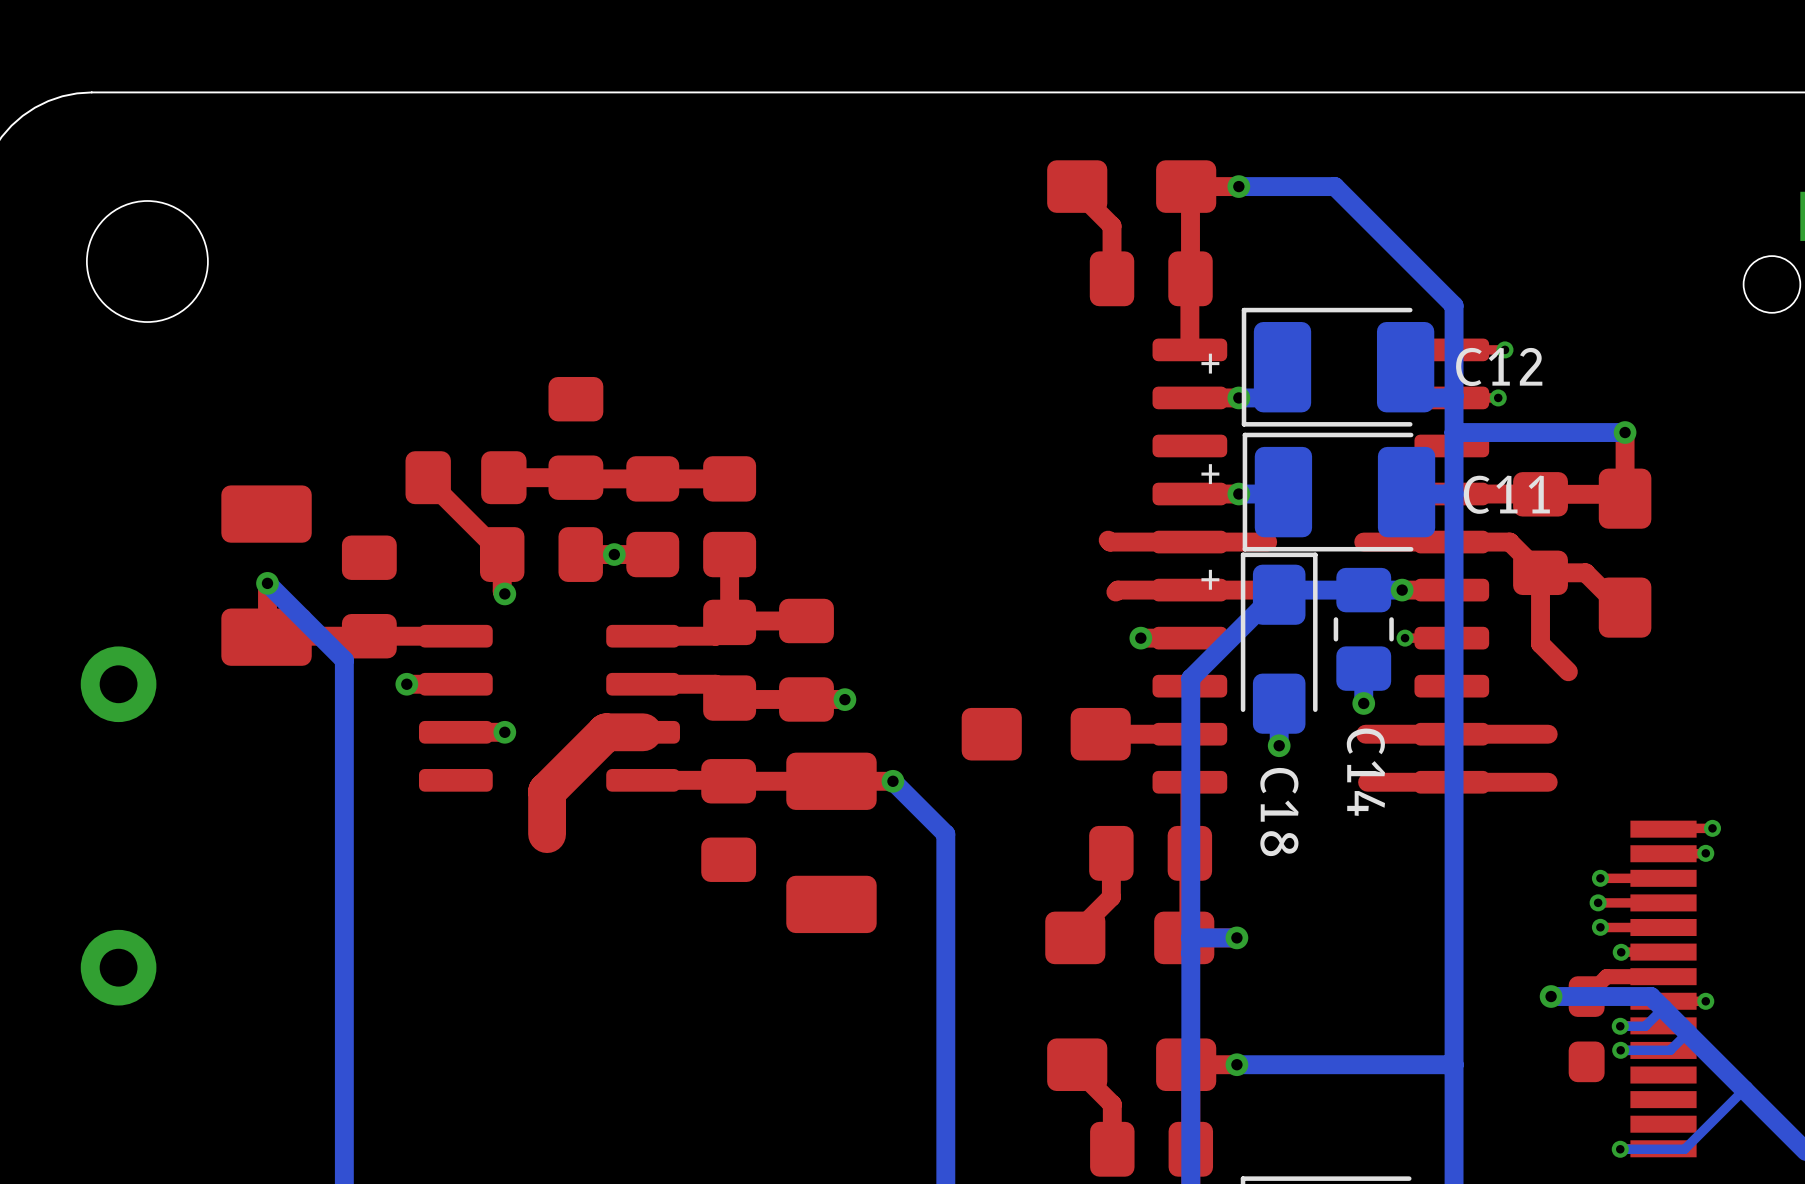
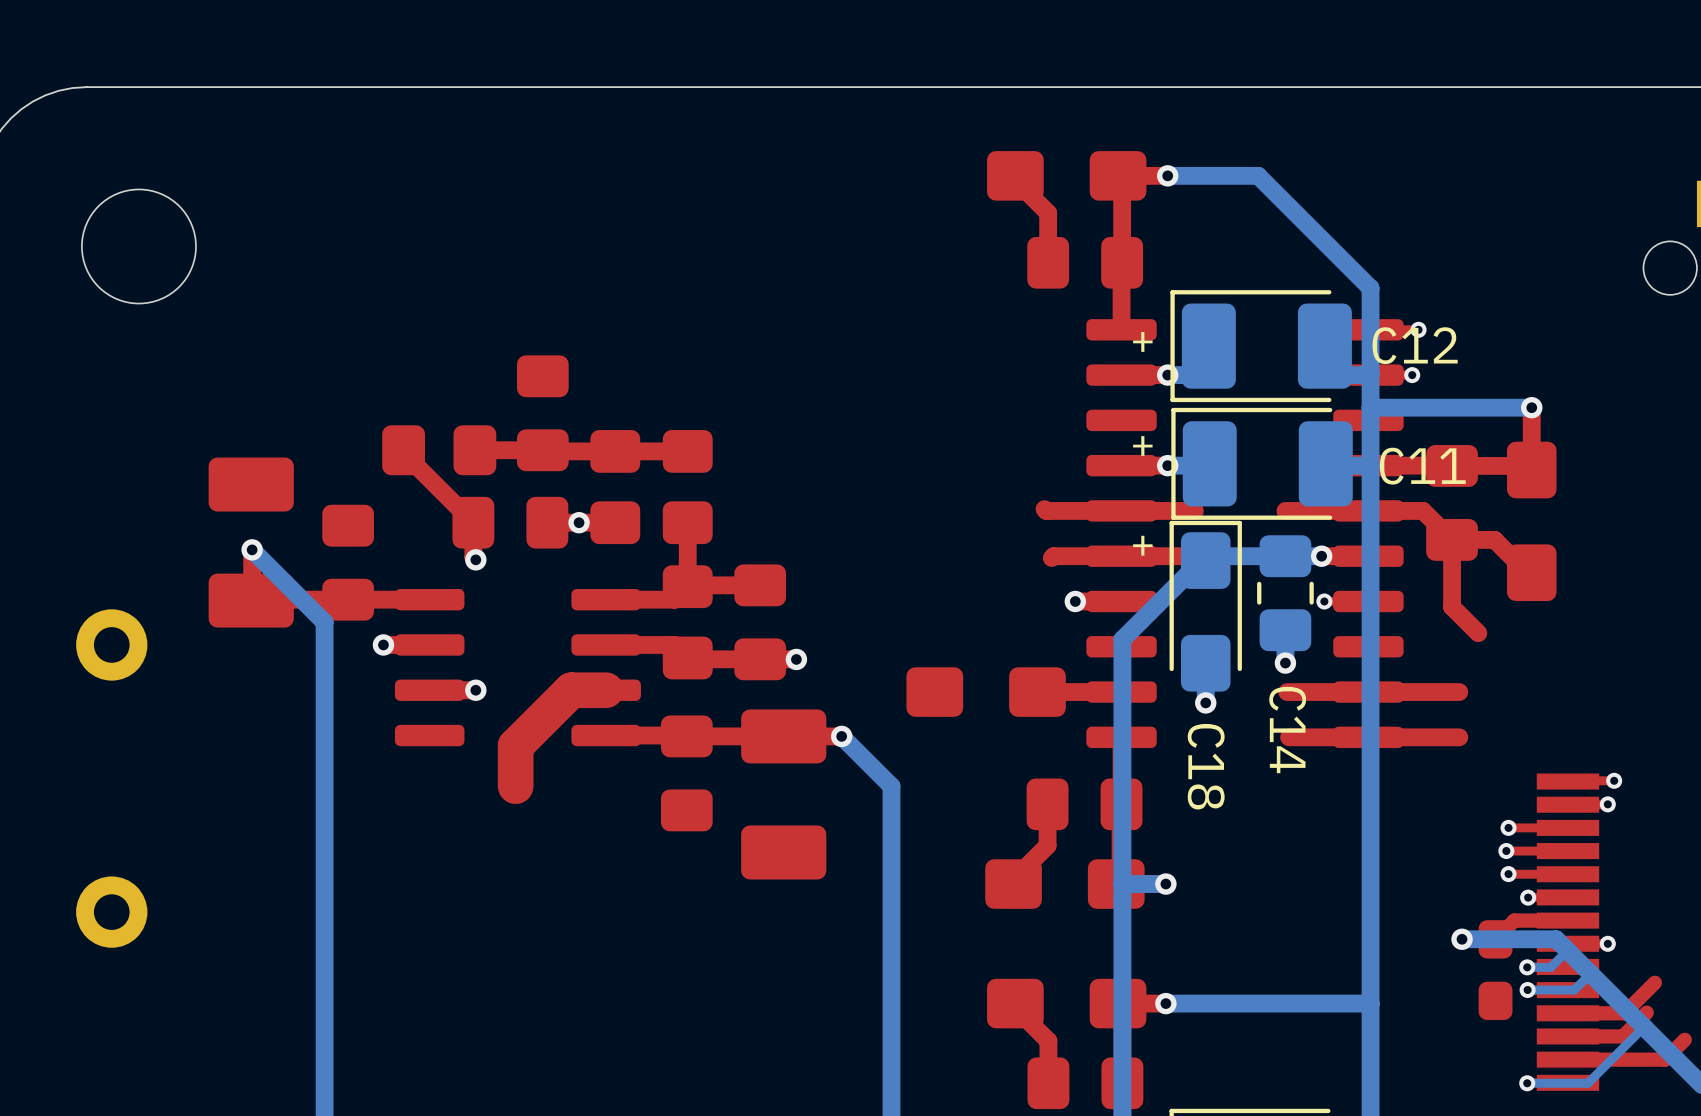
top track: none -> (1654, 982) (1624, 1013) (1567, 1013)
top track: none -> (1646, 1012) (1622, 1036) (1567, 1036)
top track: none -> (1684, 1039) (1664, 1059) (1567, 1059)

